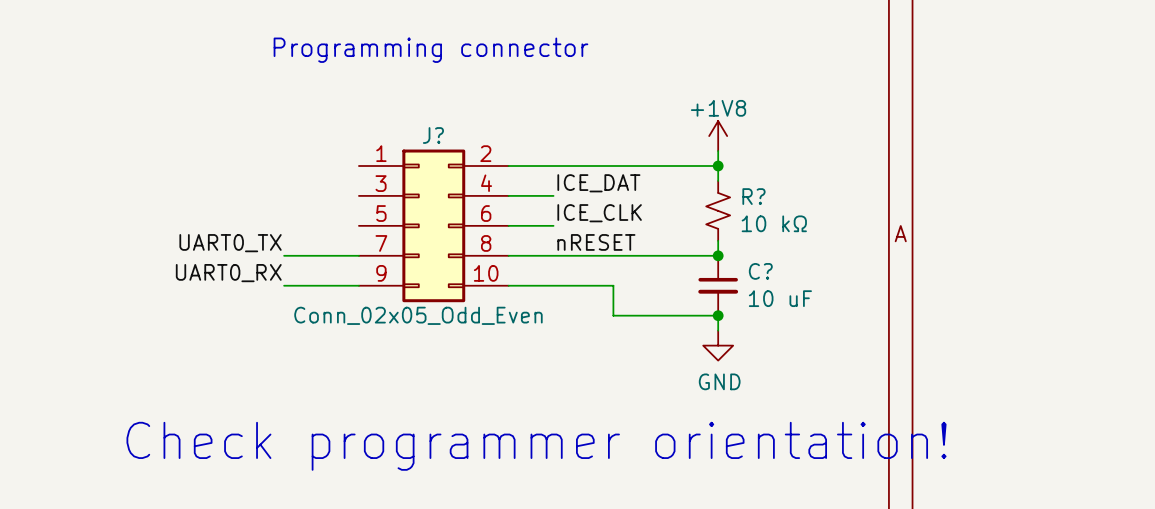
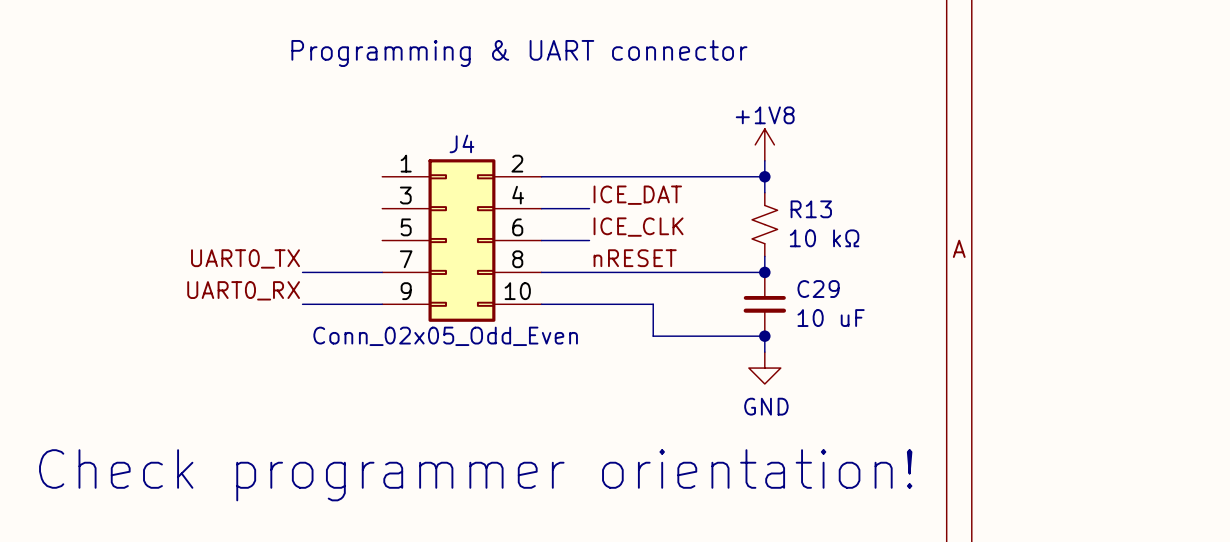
text: Programming connector (430, 50) -> Programming & UART connector (519, 53)
J? name: J? (433, 135) -> J4 (461, 143)
R? name: R? (753, 196) -> R13 (811, 209)
C? name: C? (760, 271) -> C29 (818, 289)
text position: Check programmer orientation! (536, 446) -> Check programmer orientation! (475, 475)

